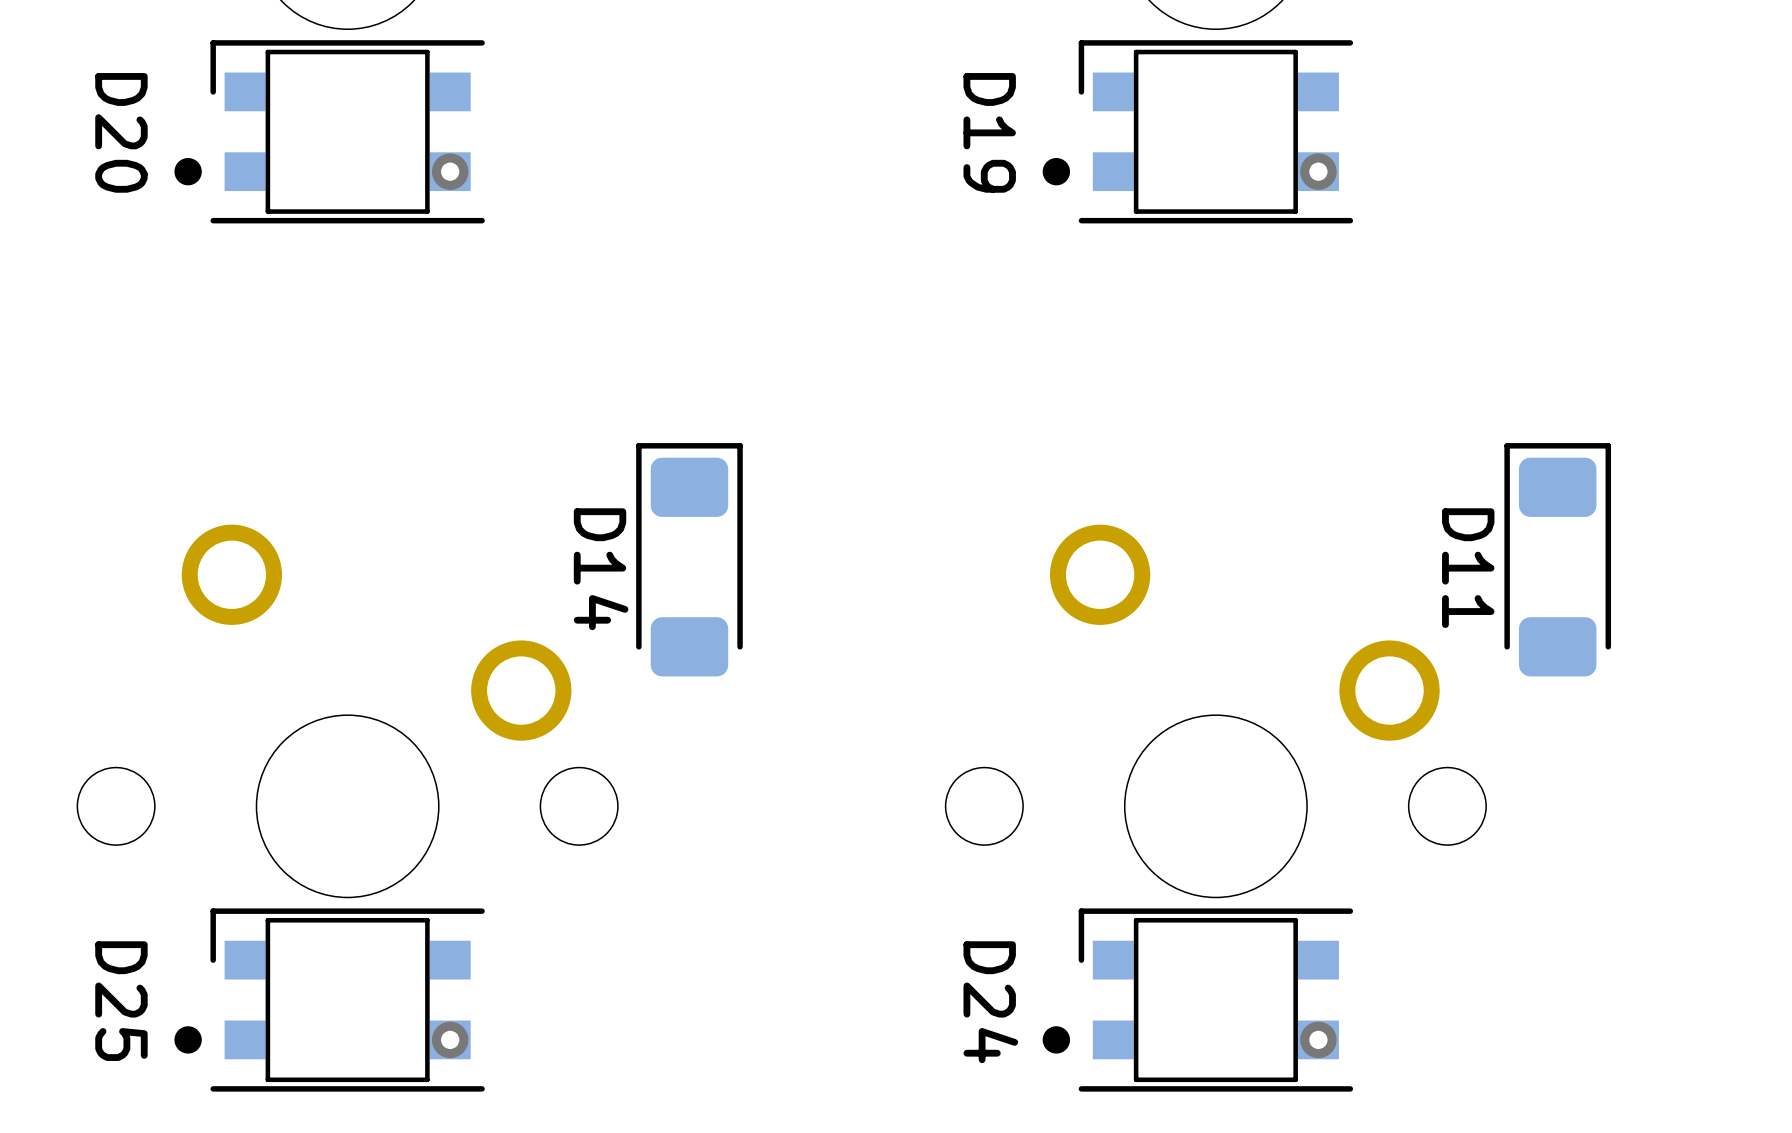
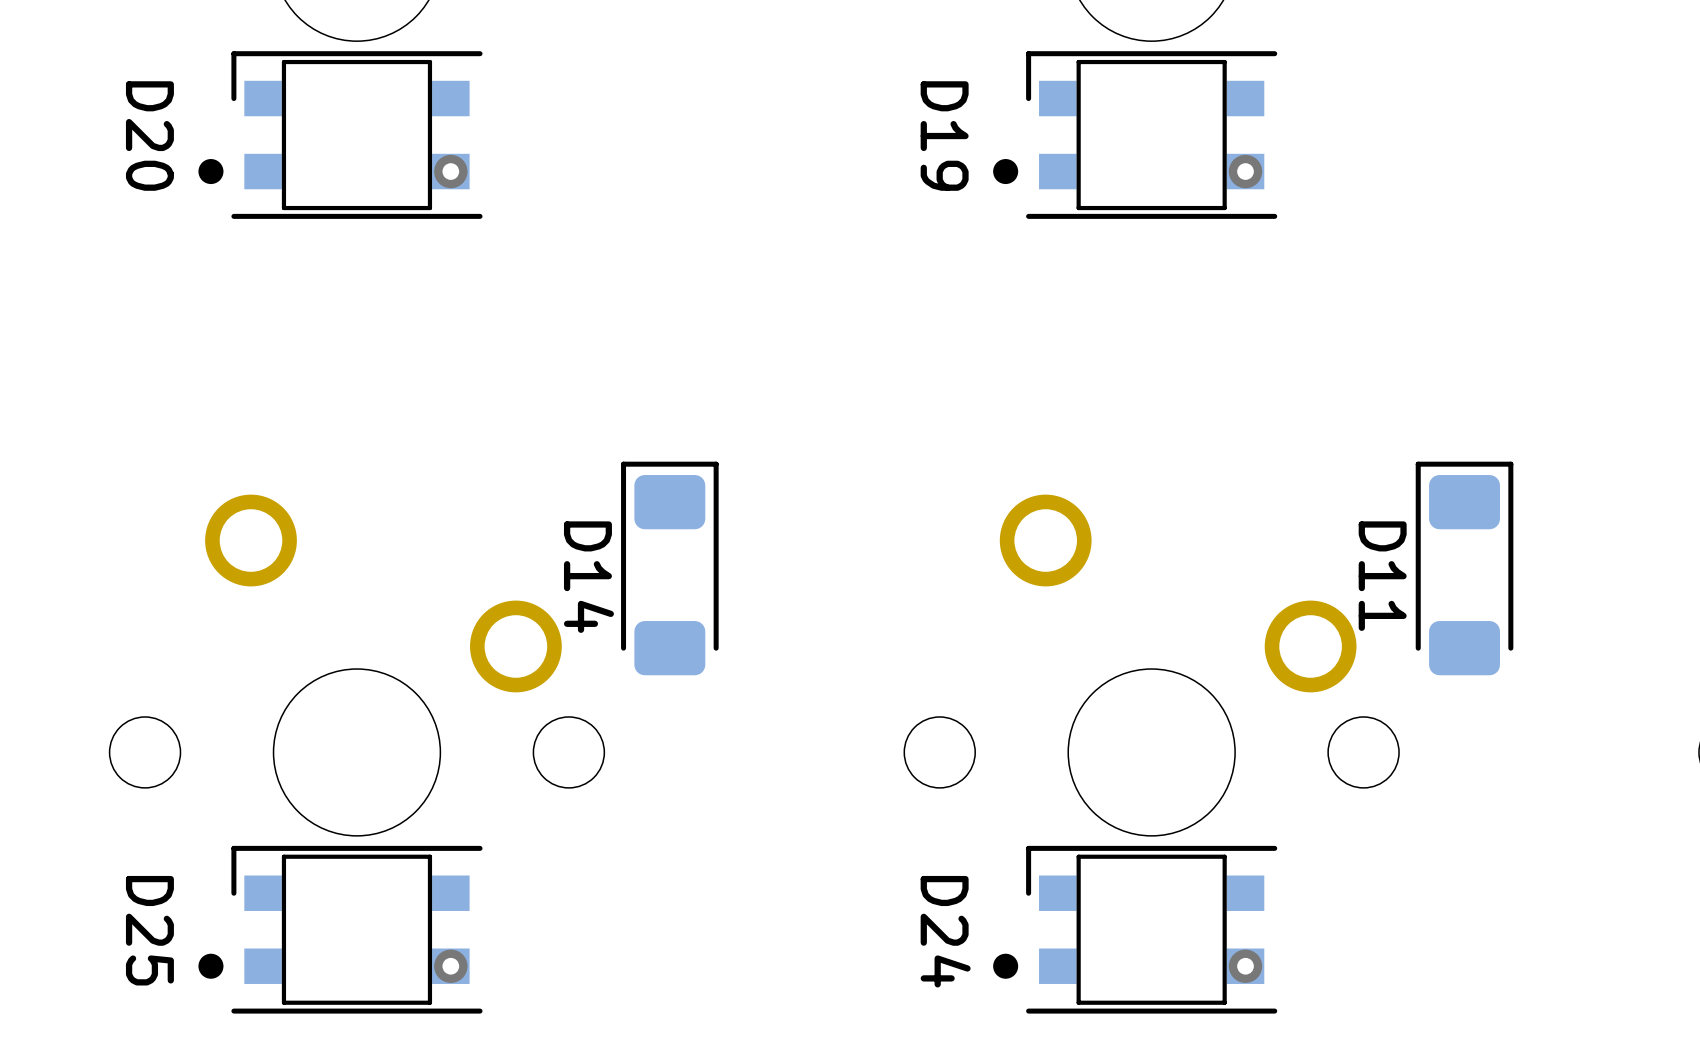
D14 position: (689, 559) -> (669, 568)
D11 position: (1557, 559) -> (1464, 568)

